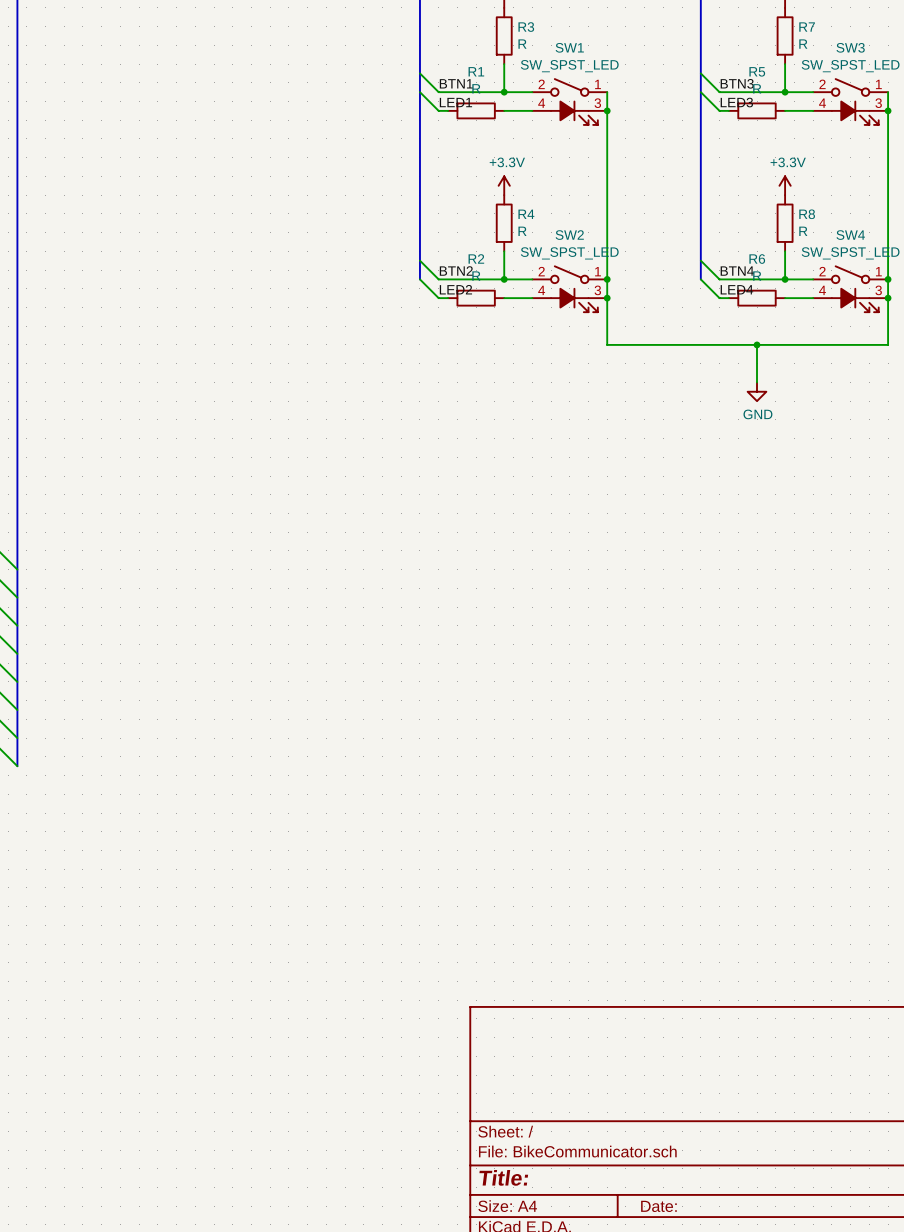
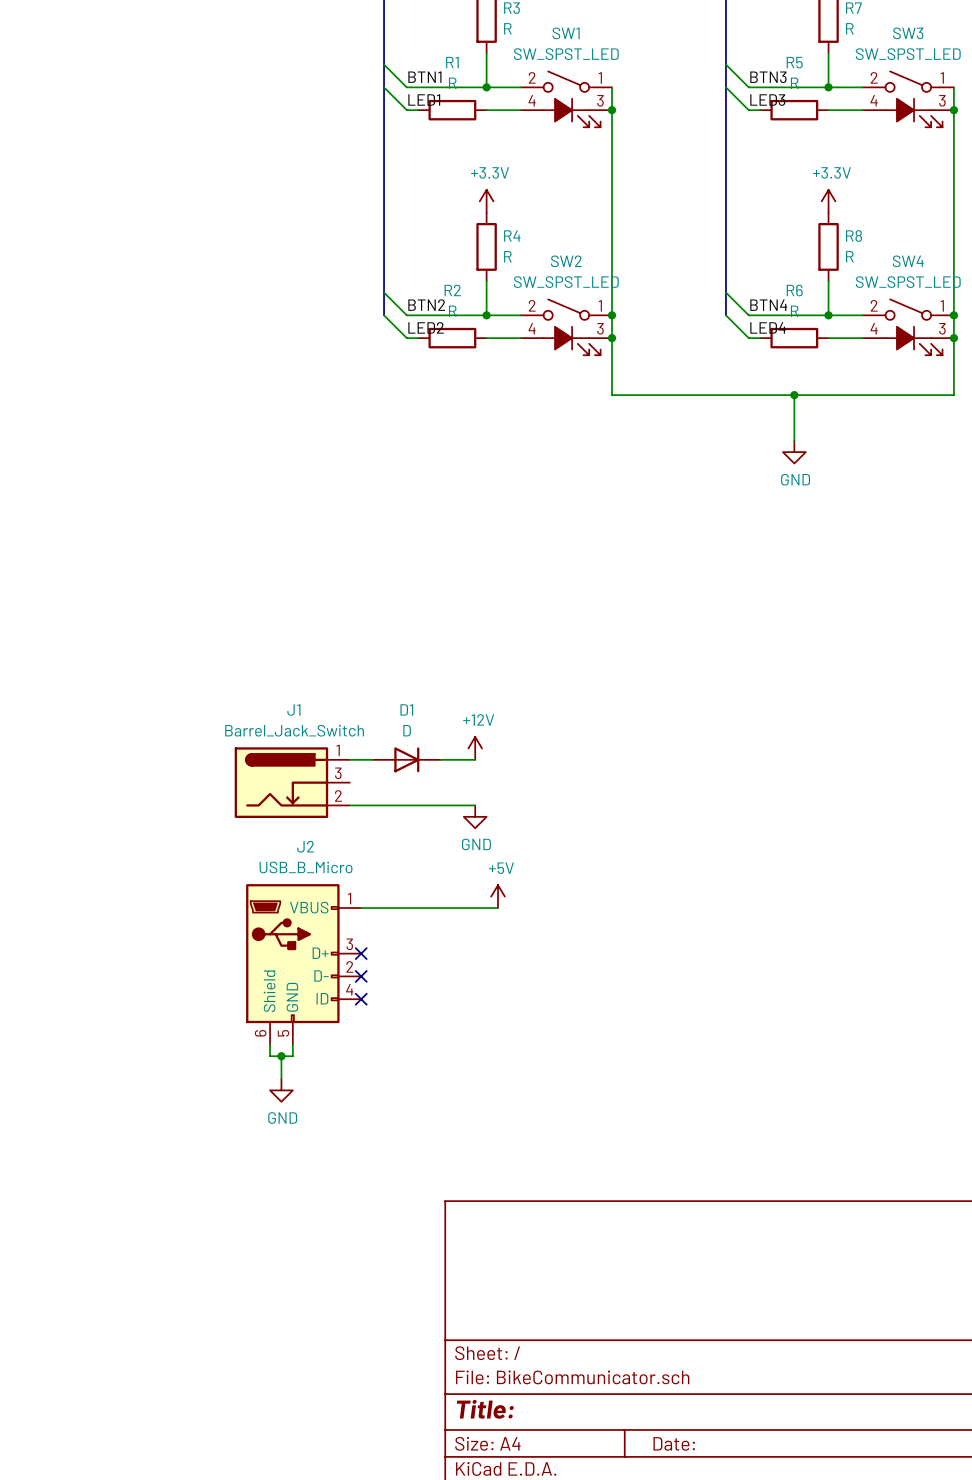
power symbol: none -> +12V (475, 748)
wire: none -> (349, 759) (372, 759)
D1: none -> D (406, 759)
wire: none -> (441, 759) (475, 759)
J1: none -> Barrel_Jack_Switch (292, 782)
wire: none -> (349, 805) (475, 805)
power symbol: none -> GND (475, 816)
power symbol: none -> +5V (498, 896)
wire: none -> (361, 908) (498, 908)
no-connect mark: none -> (361, 953)
J2: none -> USB_B_Micro (303, 964)
no-connect mark: none -> (361, 976)
no-connect mark: none -> (361, 999)
wire: none -> (270, 1044) (270, 1056) (292, 1056) (292, 1044)
wire: none -> (281, 1056) (281, 1079)
junction: none -> (281, 1056)
power symbol: none -> GND (281, 1090)

